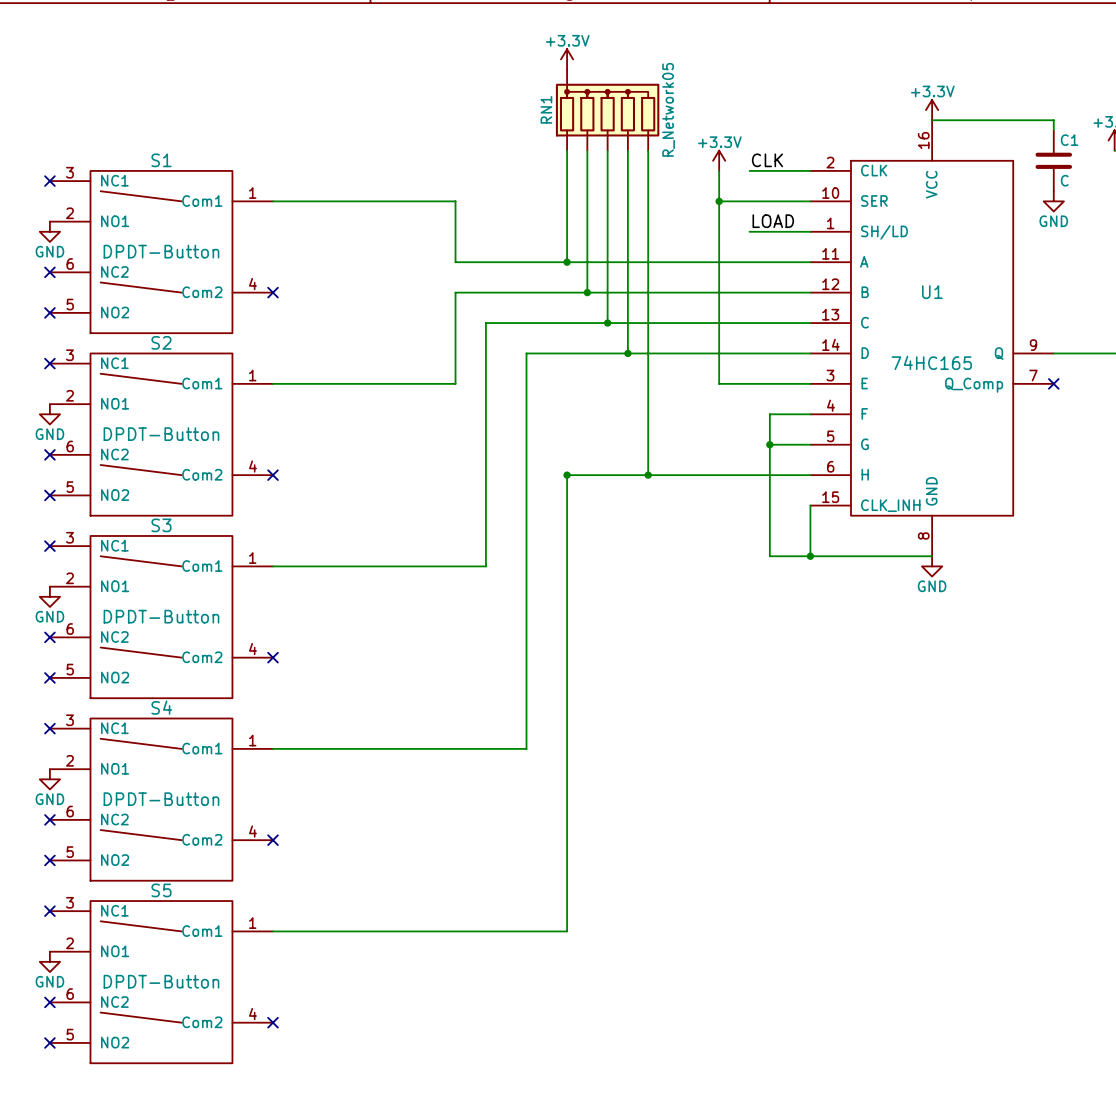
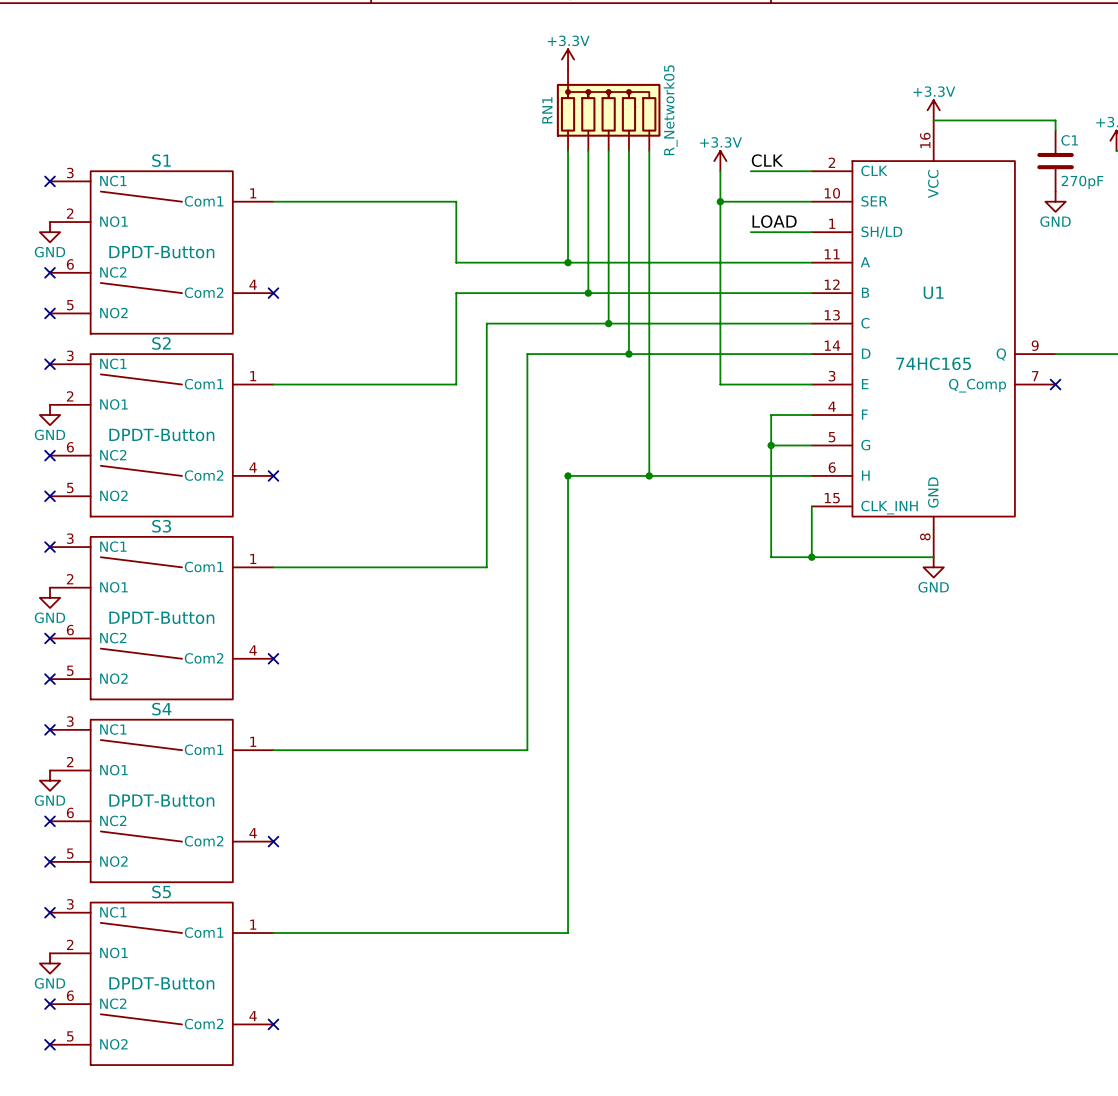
C1 value: C (1064, 180) -> 270pF (1082, 182)

